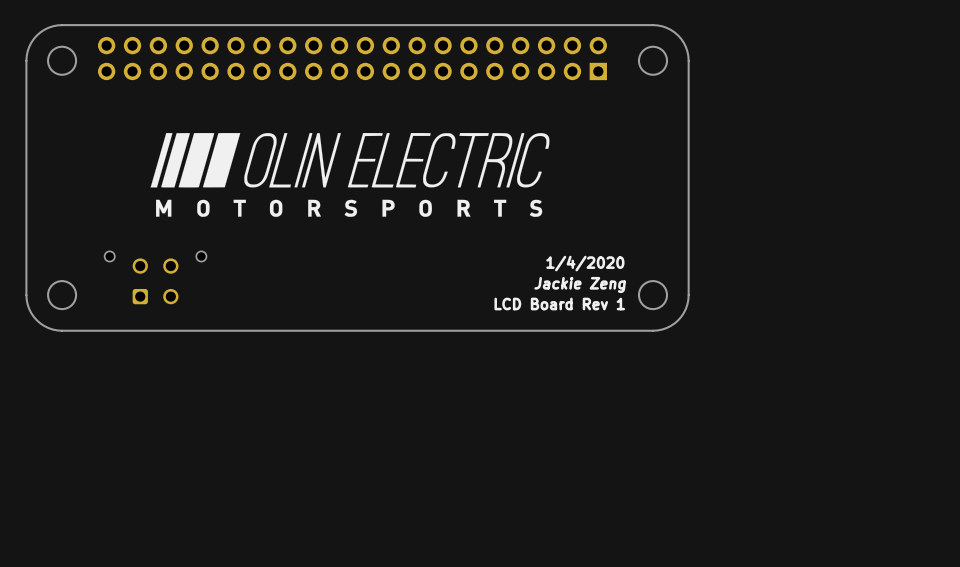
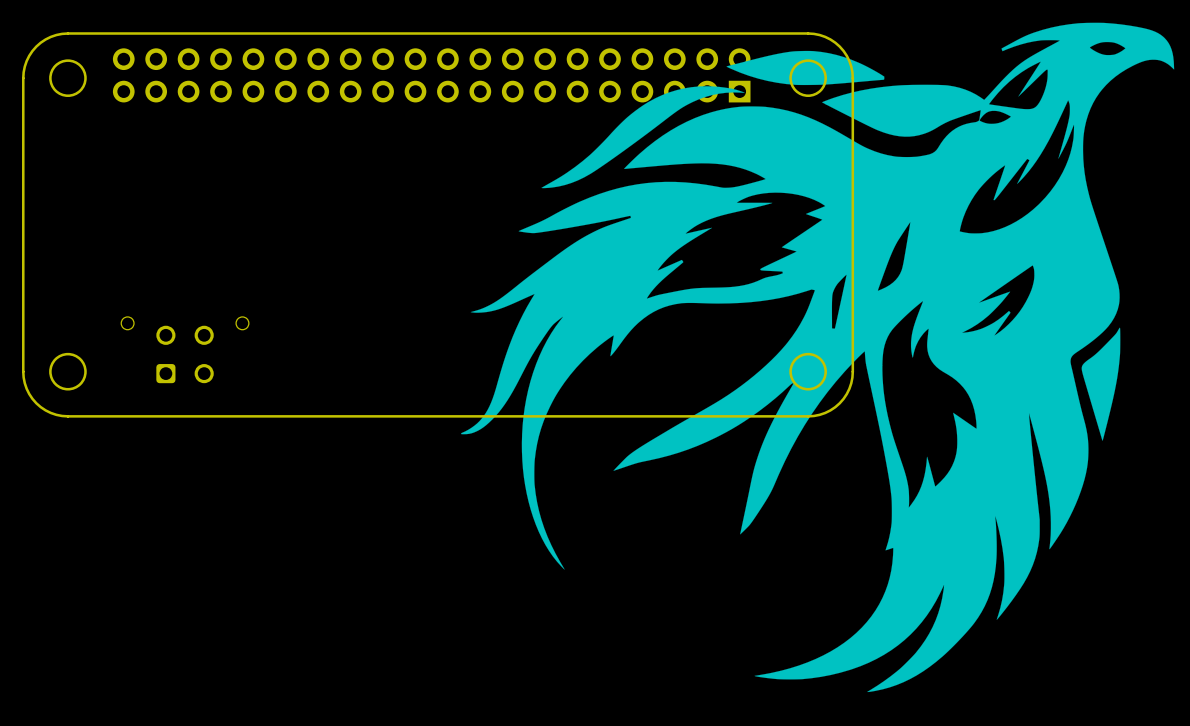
drawing: none -> [461, 22, 1175, 693]
drawing: [150, 133, 550, 217] -> none
text: 1/4/2020 (585, 263) -> none
text: Jackie Zeng (580, 285) -> none
text: LCD Board Rev 1 (559, 304) -> none

